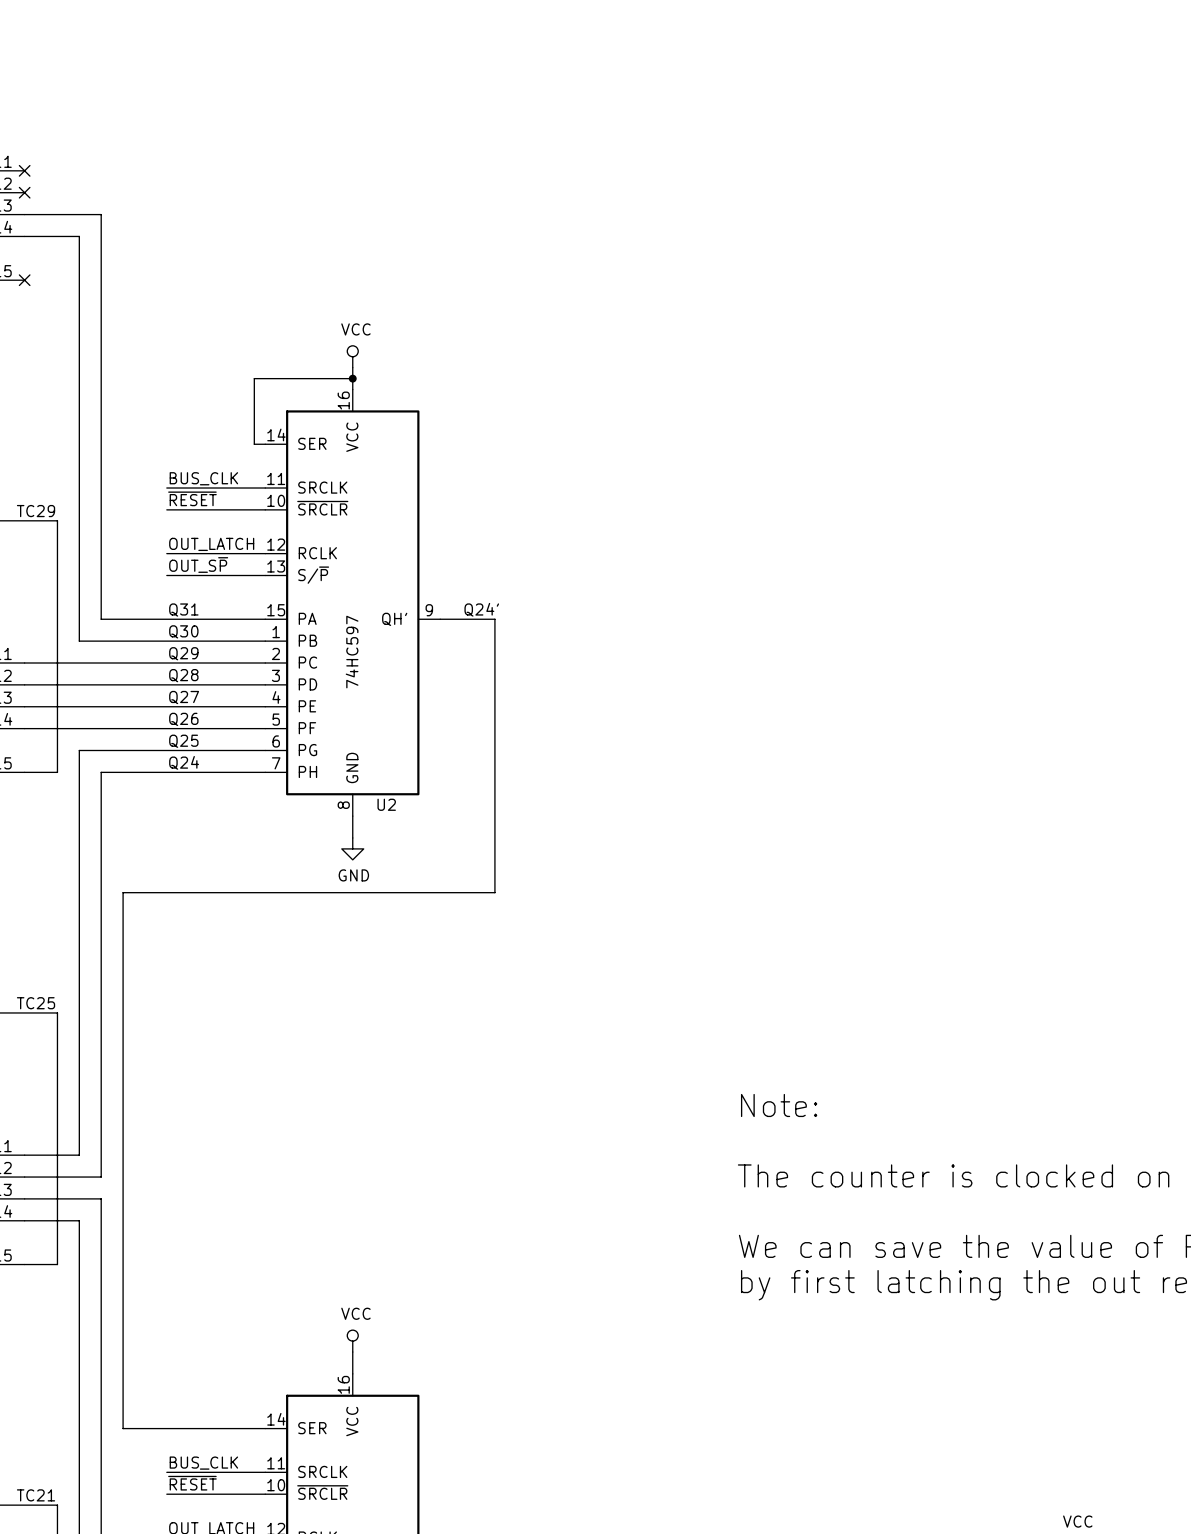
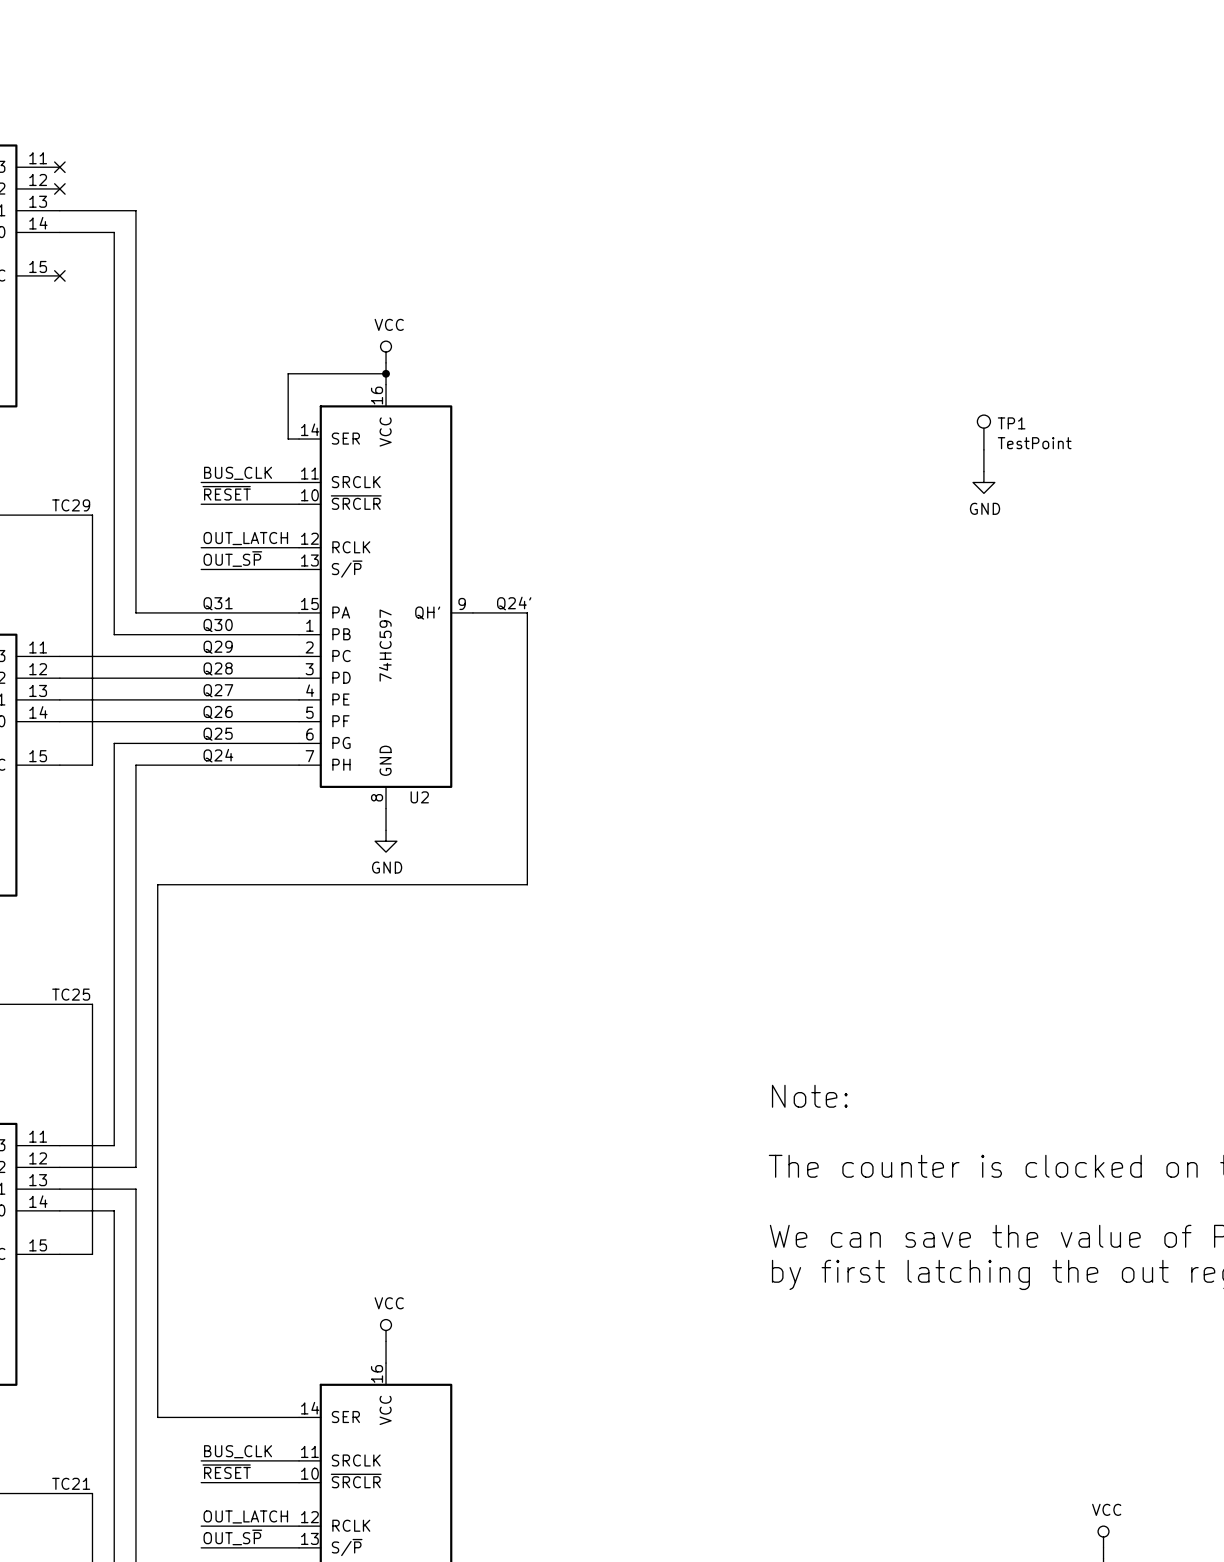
TP1: none -> TestPoint (983, 432)
wire: none -> (983, 449) (983, 471)
power symbol: none -> GND (983, 482)

